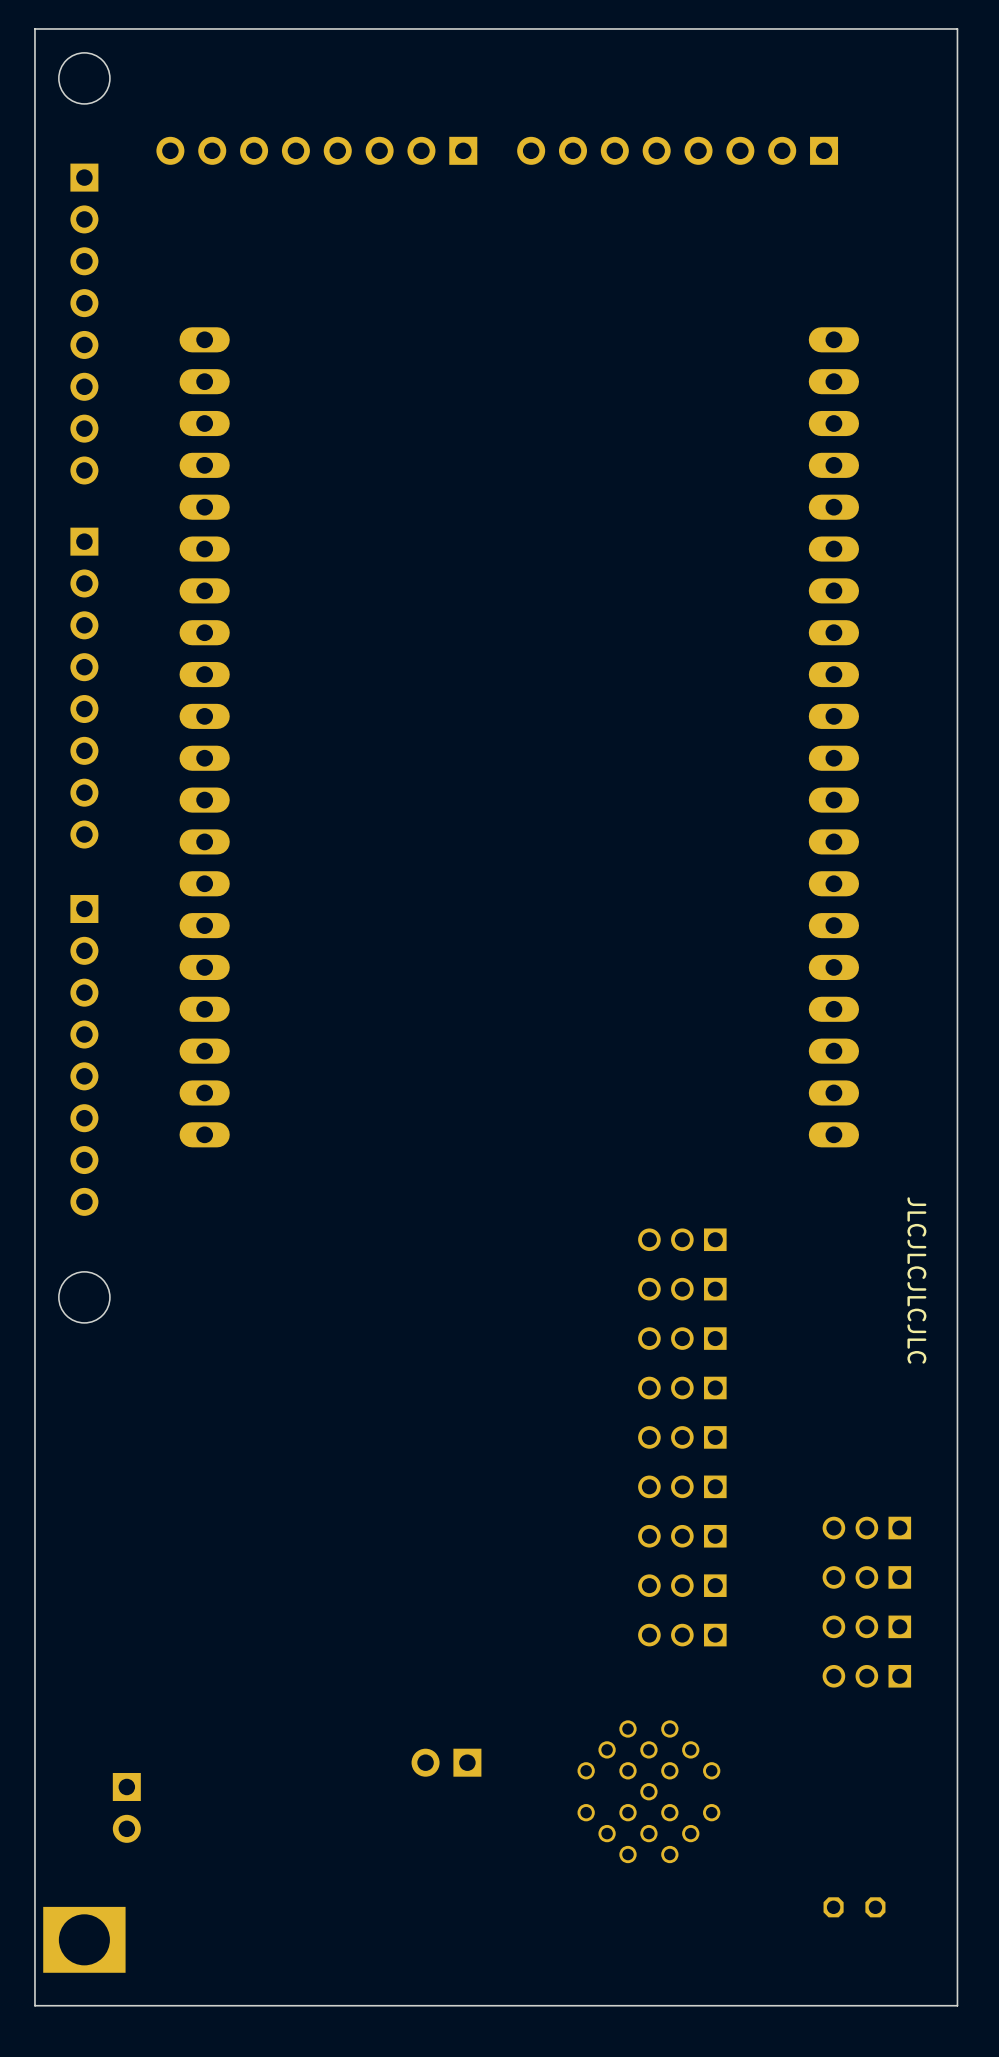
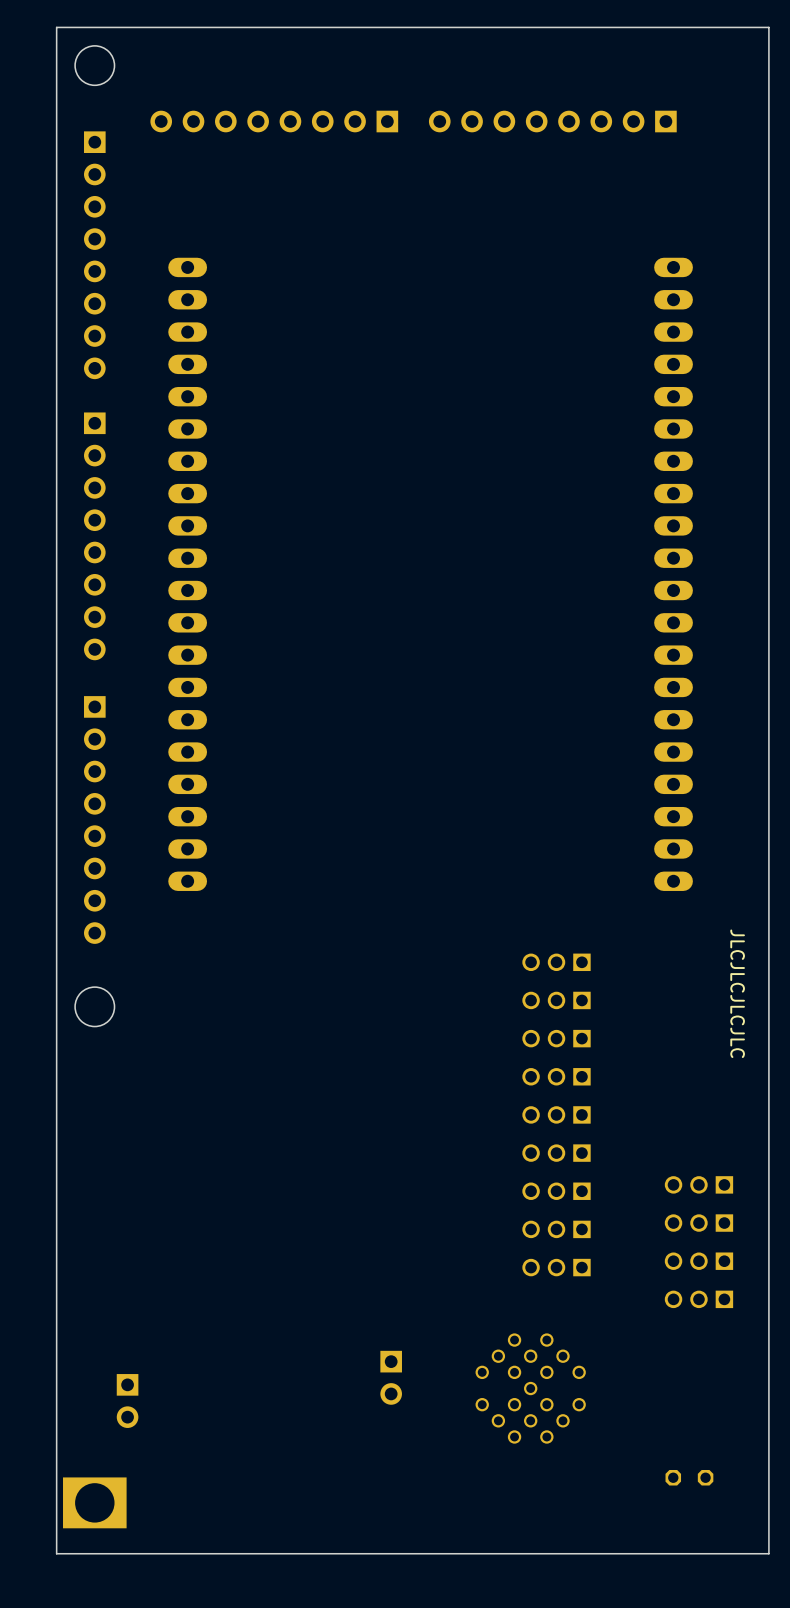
part rotation: 0° (446, 1762) -> 90° counterclockwise (391, 1377)

